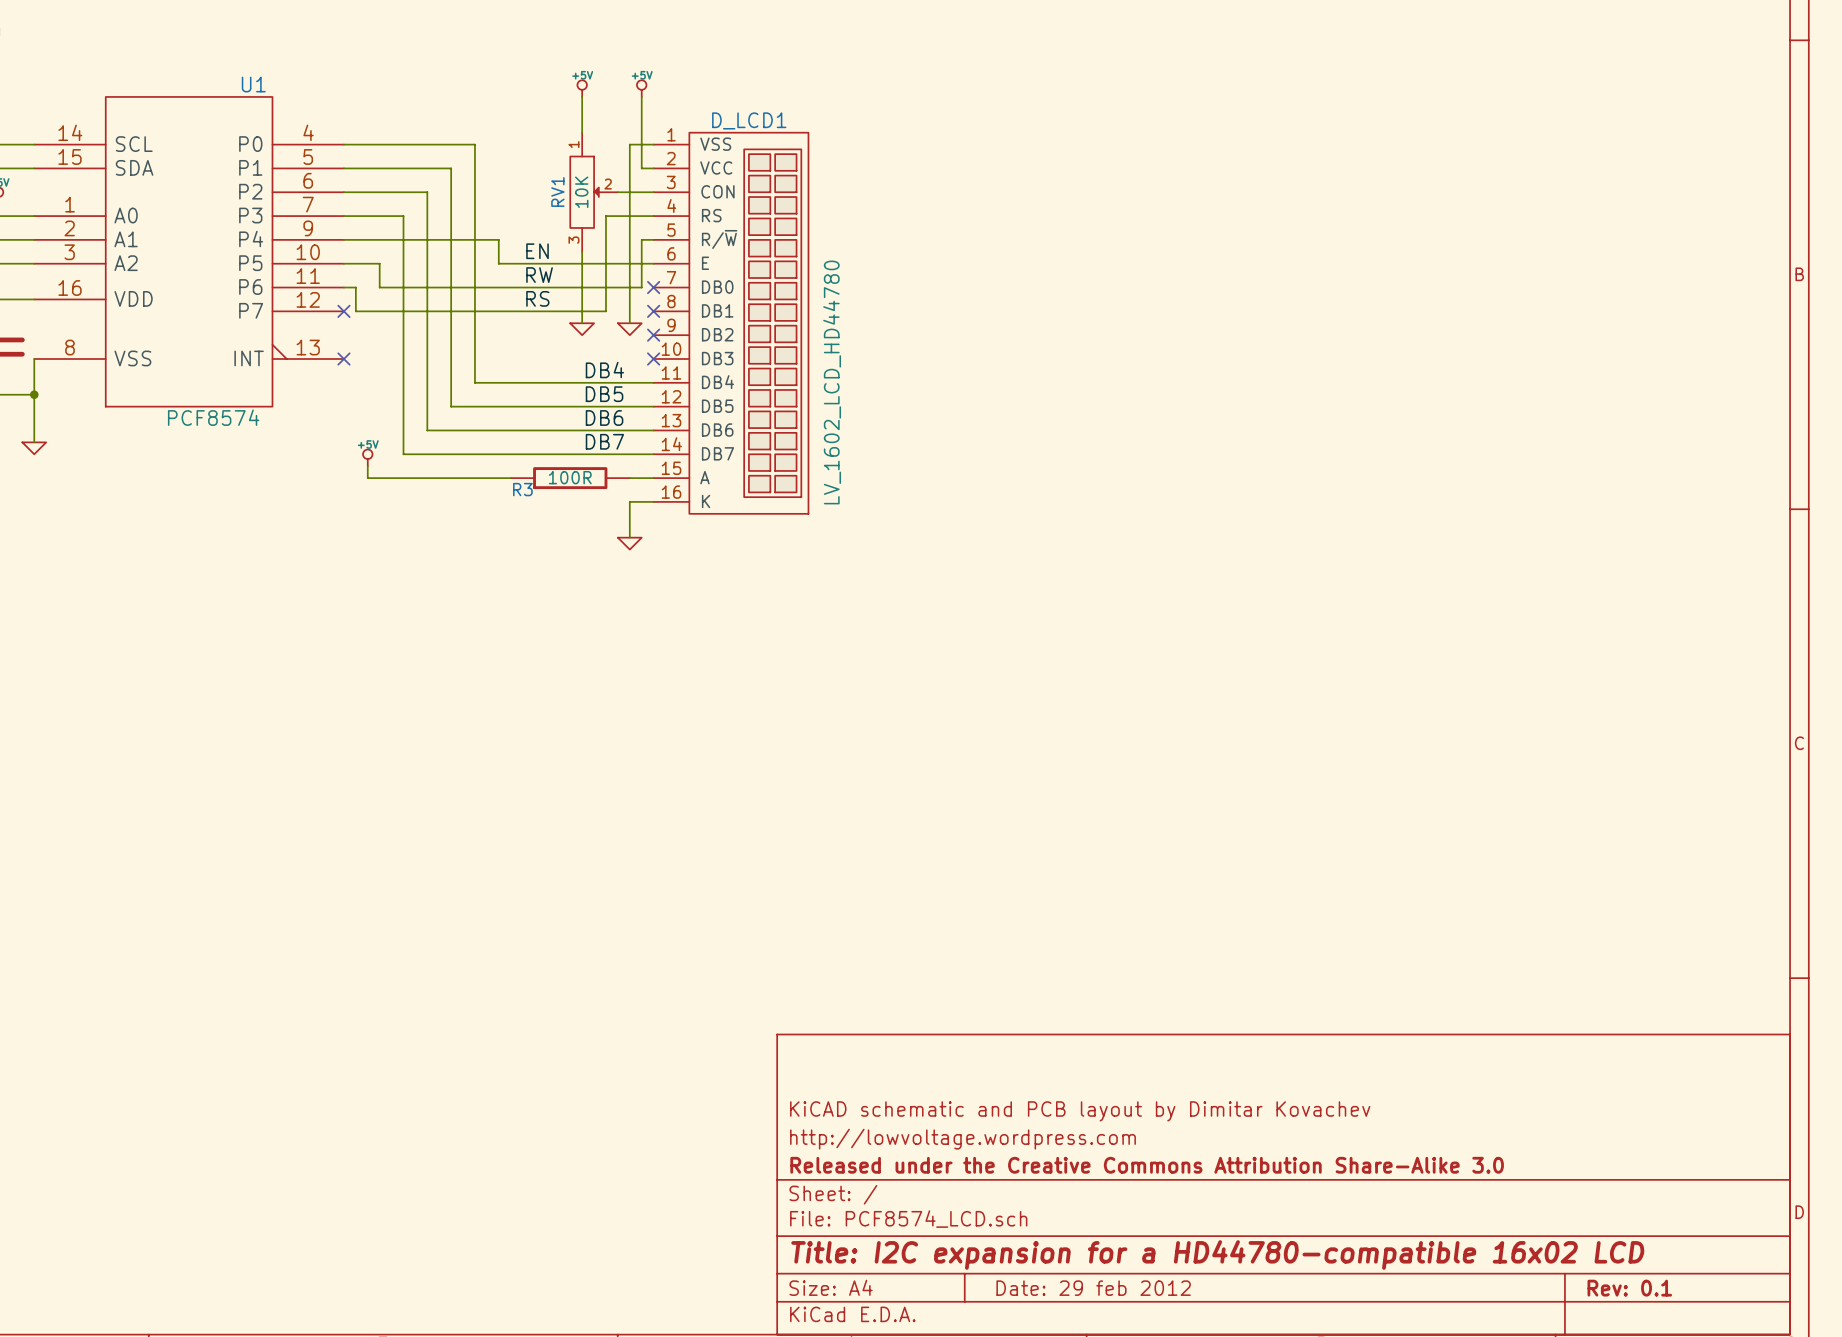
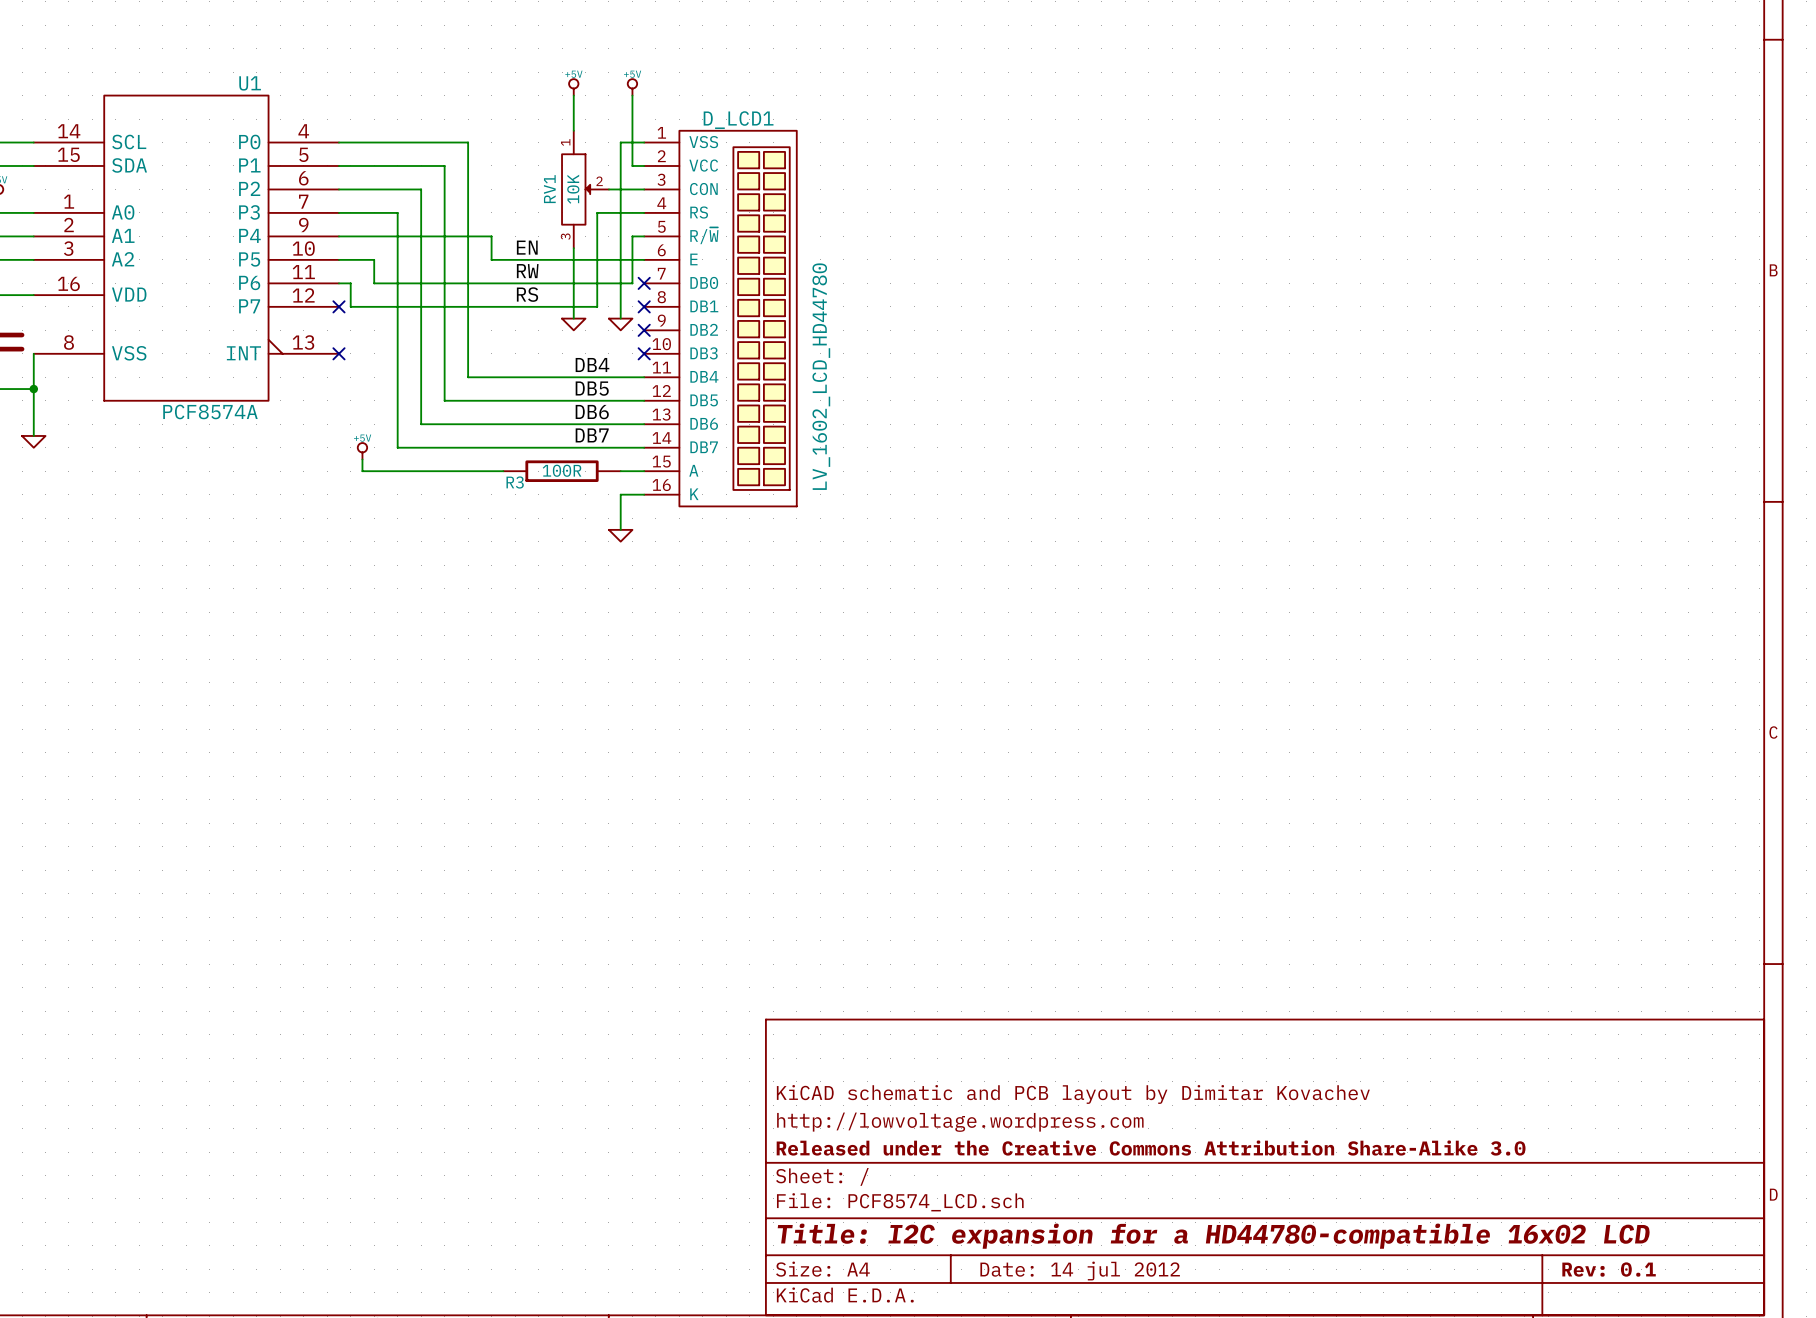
U1 value: PCF8574 (213, 417) -> PCF8574A (210, 411)
title block: Date: 29 feb 2012 (1093, 1288) -> Date: 14 jul 2012 (1080, 1271)

